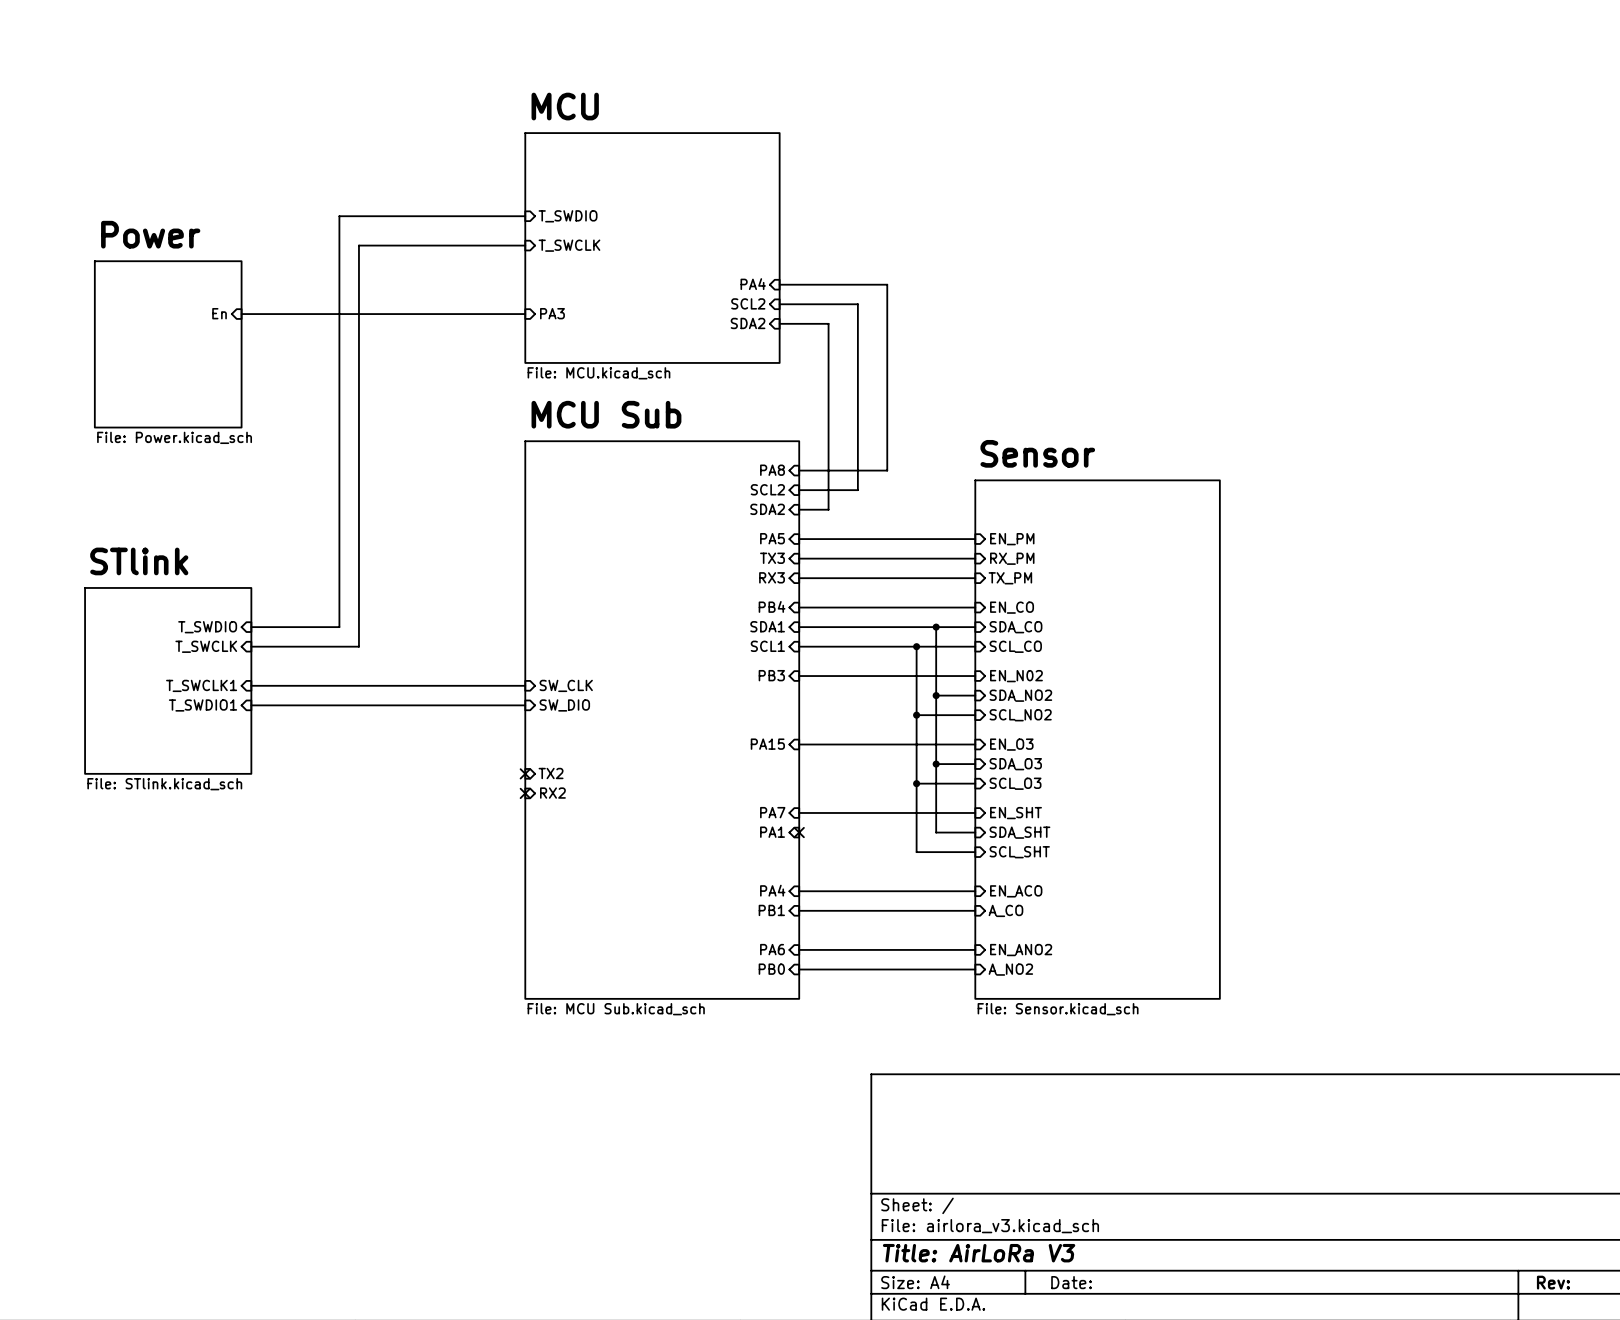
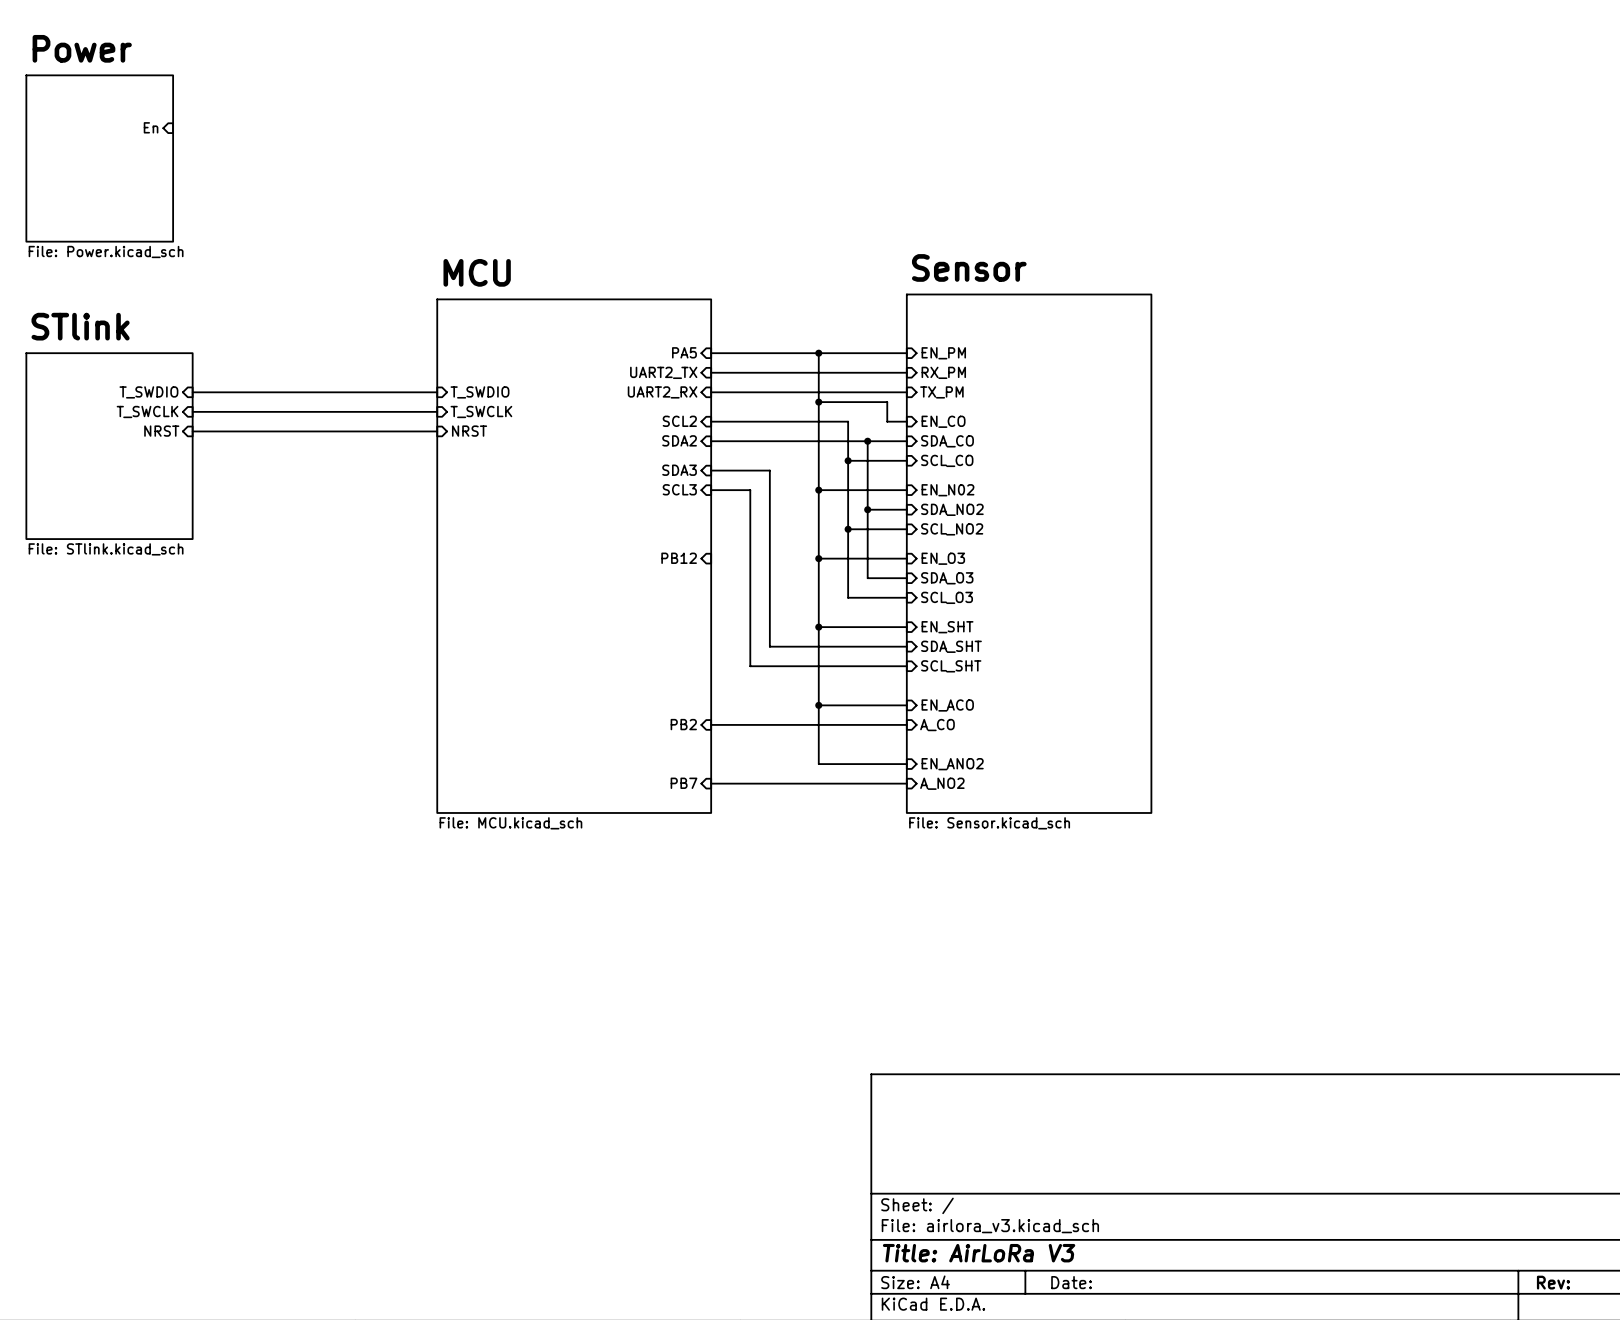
sheet pin: none -> En (151, 127)
sheet Power: none -> File: Power.kicad_sch (99, 158)
wire: (525, 216) (339, 216) (339, 627) (251, 627) -> none
sheet pin: T_SWDIO (568, 216) -> none
wire: (525, 245) (358, 245) (358, 646) (251, 646) -> none
sheet pin: T_SWCLK (569, 245) -> none
sheet MCU: File: MCU.kicad_sch (652, 248) -> none
sheet pin: PA4 (753, 284) -> none
wire: (779, 284) (887, 284) (887, 402) -> (818, 402) (887, 402)
sheet pin: SCL2 (748, 303) -> none
wire: (779, 304) (857, 304) (857, 490) -> (906, 490) (857, 490)
sheet pin: En (219, 313) -> none
sheet pin: PA3 (552, 313) -> none
wire: (241, 314) (525, 314) -> none
sheet pin: SDA2 (748, 323) -> none
wire: (779, 323) (828, 323) (828, 509) (799, 509) -> none
sheet Power: File: Power.kicad_sch (168, 344) -> none
sheet pin: none -> PA5 (684, 352)
wire: none -> (711, 353) (906, 353)
wire: none -> (818, 353) (818, 764) (906, 764)
junction: none -> (818, 353)
sheet pin: none -> EN_PM (943, 353)
sheet pin: none -> UART2_TX (663, 372)
wire: none -> (711, 372) (906, 372)
sheet pin: none -> RX_PM (943, 372)
sheet pin: none -> T_SWDIO (148, 392)
wire: none -> (192, 392) (437, 392)
sheet pin: none -> T_SWDIO (480, 392)
sheet pin: none -> UART2_RX (662, 392)
wire: none -> (711, 392) (906, 392)
sheet pin: none -> TX_PM (941, 392)
junction: none -> (818, 402)
sheet pin: none -> T_SWCLK (147, 411)
wire: none -> (192, 411) (437, 411)
sheet pin: none -> T_SWCLK (481, 411)
sheet pin: none -> SCL2 (679, 421)
wire: none -> (711, 421) (848, 421) (848, 597) (906, 597)
wire: (887, 421) (887, 470) (799, 470) -> (887, 421) (906, 421)
sheet pin: none -> EN_CO (943, 421)
sheet pin: none -> NRST (161, 431)
wire: none -> (192, 431) (437, 431)
sheet pin: none -> NRST (469, 431)
sheet pin: none -> SDA2 (679, 440)
wire: none -> (711, 441) (906, 441)
junction: none -> (867, 441)
sheet pin: none -> SDA_CO (947, 441)
sheet STlink: none -> File: STlink.kicad_sch (109, 446)
wire: none -> (848, 460) (906, 460)
junction: none -> (848, 460)
sheet pin: none -> SCL_CO (947, 460)
sheet pin: none -> SDA3 (679, 470)
wire: none -> (711, 470) (769, 470) (769, 646) (799, 646)
sheet pin: PA8 (772, 470) -> none
sheet pin: none -> SCL3 (679, 489)
sheet pin: SCL2 (767, 489) -> none
wire: none -> (711, 490) (750, 490) (750, 666) (906, 666)
wire: (799, 490) (818, 490) -> none
junction: none -> (818, 490)
sheet pin: none -> EN_N02 (947, 490)
sheet pin: SDA2 (767, 509) -> none
wire: none -> (867, 509) (906, 509)
junction: none -> (867, 509)
sheet pin: none -> SDA_NO2 (952, 509)
wire: none -> (848, 529) (906, 529)
junction: none -> (848, 529)
sheet pin: none -> SCL_NO2 (952, 529)
sheet pin: PA5 (772, 538) -> none
wire: (799, 539) (975, 539) -> none
sheet pin: EN_PM (1012, 539) -> none
sheet Sensor: none -> File: Sensor.kicad_sch (1029, 553)
sheet MCU: none -> File: MCU.kicad_sch (574, 556)
sheet pin: none -> PB12 (679, 558)
sheet pin: TX3 (772, 558) -> none
wire: (799, 558) (818, 558) -> none
junction: none -> (818, 558)
wire: (906, 558) (975, 558) -> none
sheet pin: none -> EN_O3 (943, 558)
sheet pin: RX_PM (1012, 558) -> none
sheet pin: RX3 (772, 577) -> none
wire: (799, 578) (867, 578) -> (867, 441) (867, 578)
wire: (906, 578) (975, 578) -> none
sheet pin: none -> SDA_O3 (947, 578)
sheet pin: TX_PM (1010, 578) -> none
sheet pin: none -> SCL_O3 (947, 597)
sheet pin: PB4 (772, 606) -> none
wire: (799, 607) (975, 607) -> none
sheet pin: EN_CO (1012, 607) -> none
sheet pin: SDA1 (767, 626) -> none
sheet pin: T_SWDIO (207, 627) -> none
wire: (799, 627) (818, 627) -> none
junction: none -> (818, 627)
wire: (906, 627) (975, 627) -> none
wire: (936, 627) (936, 832) (975, 832) -> none
junction: (936, 627) -> none
sheet pin: none -> EN_SHT (947, 627)
sheet pin: SDA_CO (1015, 627) -> SDA_SHT (951, 646)
sheet pin: T_SWCLK (206, 646) -> none
sheet pin: SCL1 (767, 646) -> none
wire: (906, 646) (975, 646) -> none
wire: (916, 646) (916, 852) (975, 852) -> none
junction: (916, 646) -> none
sheet pin: SCL_CO (1015, 646) -> SCL_SHT (951, 666)
sheet pin: PB3 (771, 675) -> none
wire: (799, 676) (975, 676) -> none
sheet pin: EN_N02 (1016, 676) -> none
sheet STlink: File: STlink.kicad_sch (168, 680) -> none
sheet pin: T_SWCLK1 (201, 685) -> none
wire: (251, 685) (525, 685) -> none
sheet pin: SW_CLK (566, 685) -> none
wire: (936, 695) (975, 695) -> none
junction: (936, 695) -> none
sheet pin: SDA_NO2 (1020, 695) -> none
sheet pin: T_SWDIO1 (202, 705) -> none
wire: (251, 705) (525, 705) -> none
sheet pin: SW_DIO (564, 705) -> none
wire: none -> (818, 705) (906, 705)
junction: none -> (818, 705)
sheet pin: none -> EN_ACO (947, 705)
wire: (916, 715) (975, 715) -> none
junction: (916, 715) -> none
sheet pin: SCL_NO2 (1020, 715) -> none
sheet MCU Sub: File: MCU Sub.kicad_sch (662, 720) -> none
sheet pin: none -> PB2 (683, 724)
wire: none -> (711, 724) (906, 724)
sheet pin: none -> A_CO (937, 725)
sheet Sensor: File: Sensor.kicad_sch (1097, 739) -> none
sheet pin: PA15 (767, 744) -> none
wire: (799, 744) (975, 744) -> none
sheet pin: EN_O3 (1011, 744) -> EN_ANO2 (952, 764)
wire: (936, 764) (975, 764) -> none
junction: (936, 764) -> none
sheet pin: SDA_O3 (1015, 764) -> none
no-connect mark: (525, 773) -> none
sheet pin: TX2 (551, 773) -> none
sheet pin: none -> PB7 (683, 783)
wire: none -> (711, 783) (906, 783)
wire: (916, 783) (975, 783) -> none
junction: (916, 783) -> none
sheet pin: none -> A_NO2 (942, 783)
sheet pin: SCL_O3 (1015, 783) -> none
no-connect mark: (525, 793) -> none
sheet pin: RX2 (552, 793) -> none
sheet pin: PA7 (772, 812) -> none
wire: (799, 812) (975, 812) -> none
sheet pin: EN_SHT (1015, 813) -> none
sheet pin: PA1 (772, 832) -> none
no-connect mark: (799, 832) -> none
sheet pin: SDA_SHT (1019, 832) -> none
sheet pin: SCL_SHT (1019, 852) -> none
sheet pin: PA4 (772, 890) -> none
wire: (799, 891) (975, 891) -> none
sheet pin: EN_ACO (1016, 891) -> none
sheet pin: PB1 (771, 910) -> none
wire: (799, 910) (975, 910) -> none
sheet pin: A_CO (1005, 910) -> none
sheet pin: PA6 (772, 949) -> none
wire: (799, 949) (975, 949) -> none
sheet pin: EN_ANO2 (1021, 950) -> none
sheet pin: PB0 (771, 969) -> none
wire: (799, 969) (975, 969) -> none
sheet pin: A_NO2 (1010, 969) -> none

